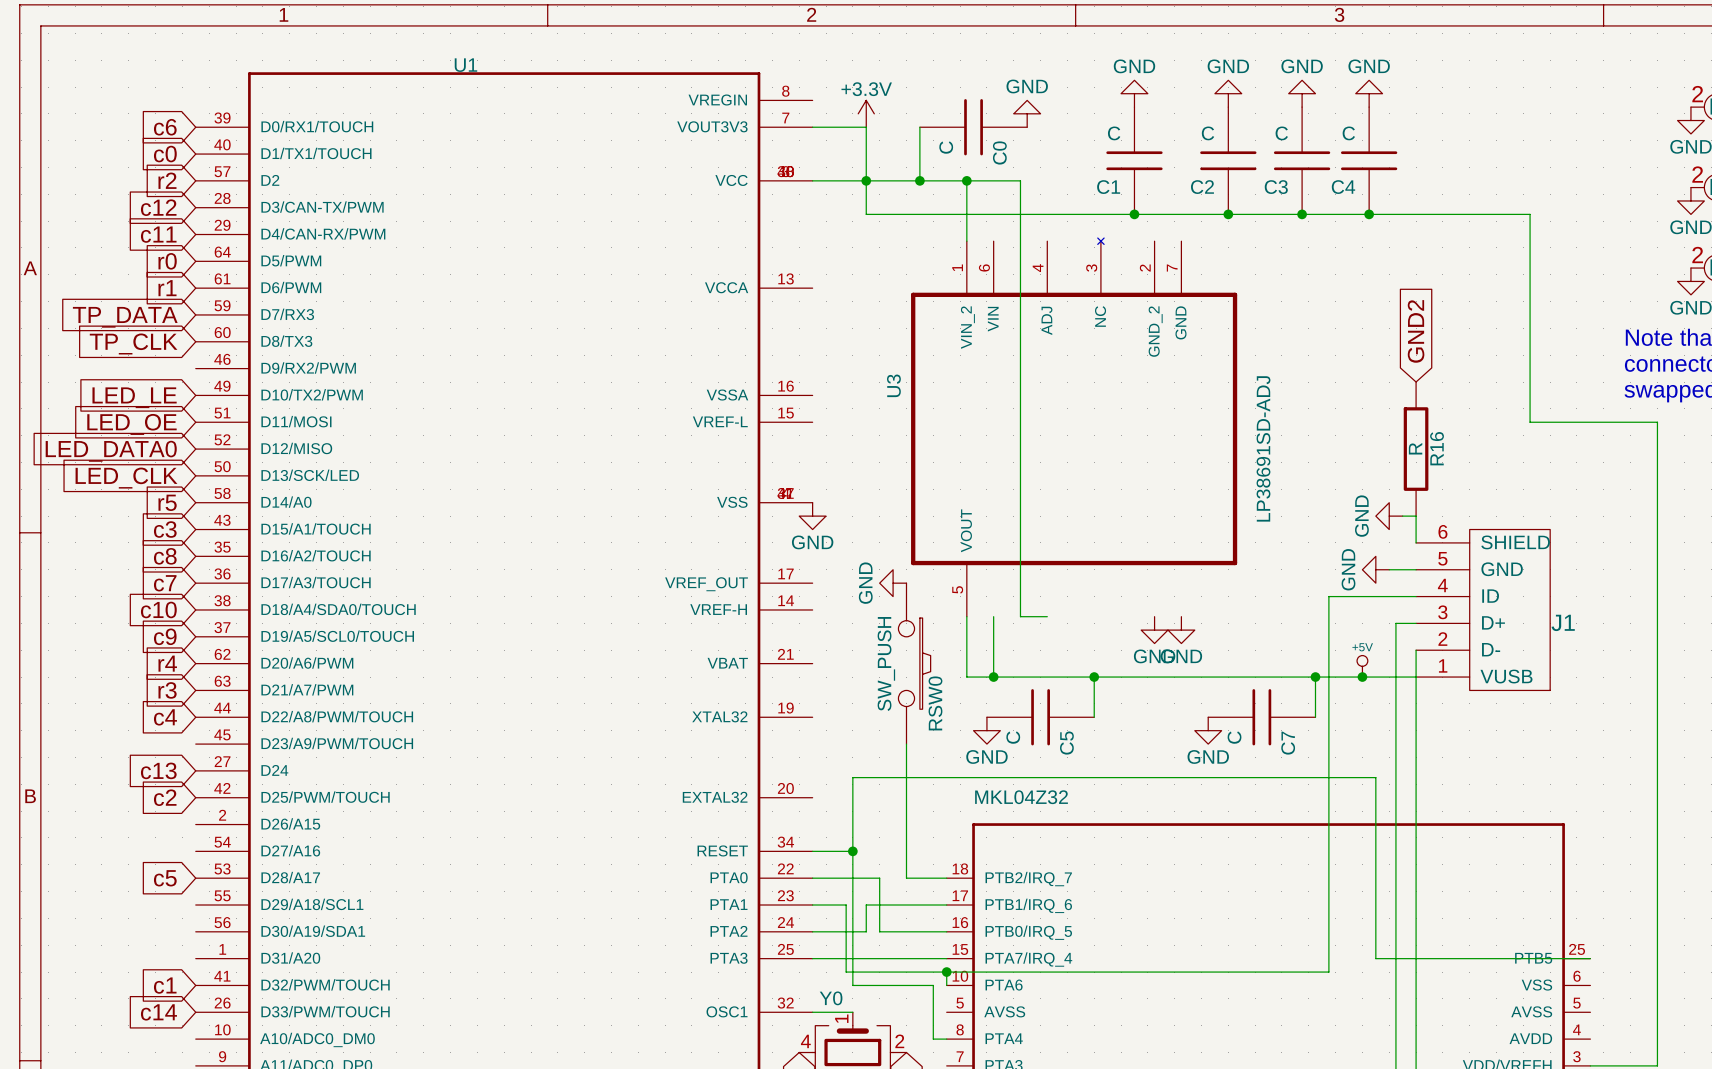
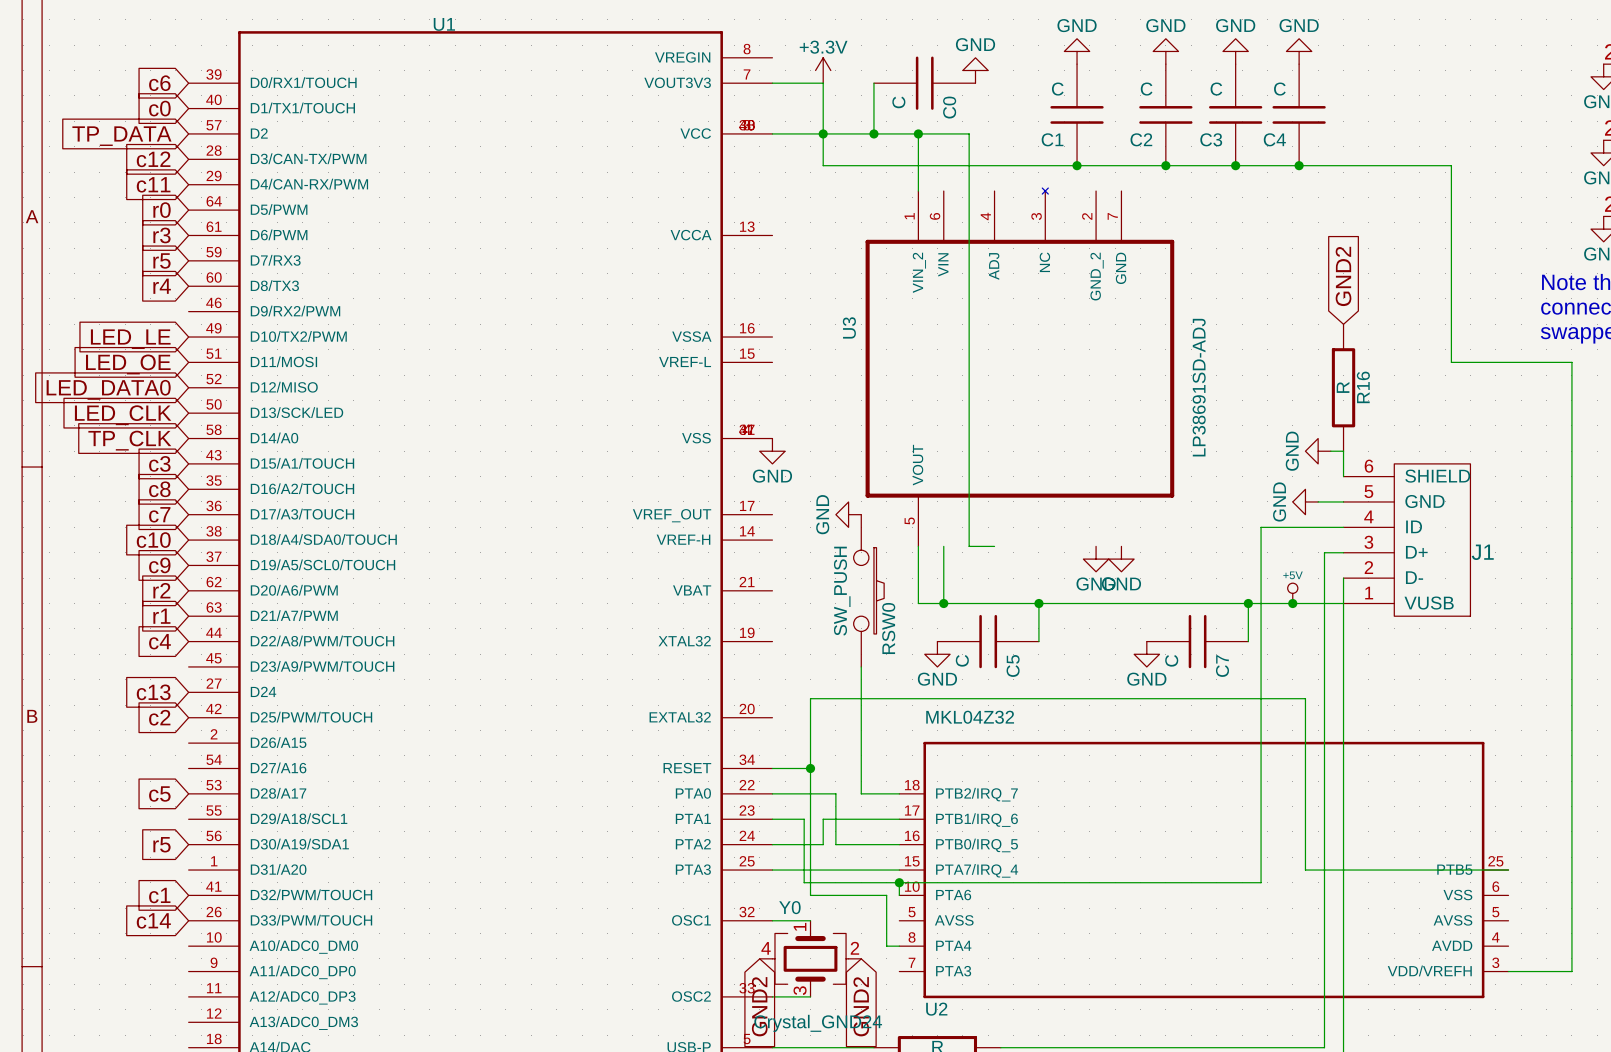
global label: r2 (167, 180) -> TP_DATA (121, 136)
global label: r1 (167, 288) -> r3 (161, 235)
global label: TP_DATA (125, 317) -> r5 (161, 260)
global label: TP_CLK (133, 343) -> r4 (162, 286)
global label: r5 (167, 502) -> TP_CLK (129, 440)
global label: r4 (167, 663) -> r2 (161, 590)
global label: r3 (167, 690) -> r1 (161, 616)
global label: none -> r5 (161, 844)

